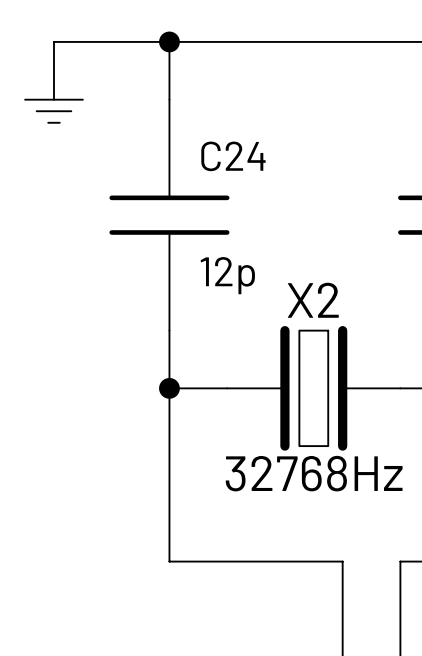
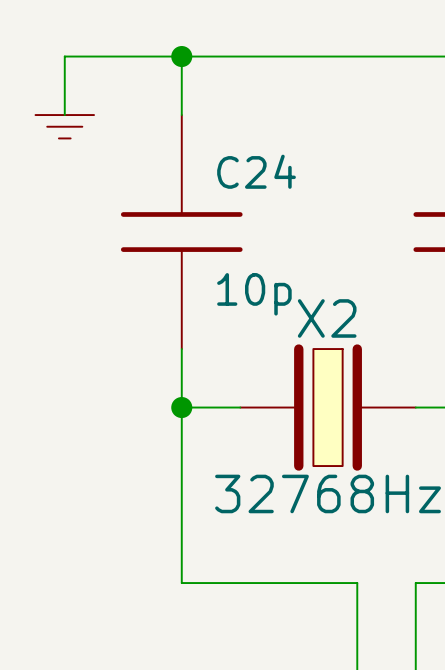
C24 value: 12p (227, 275) -> 10p (254, 294)

